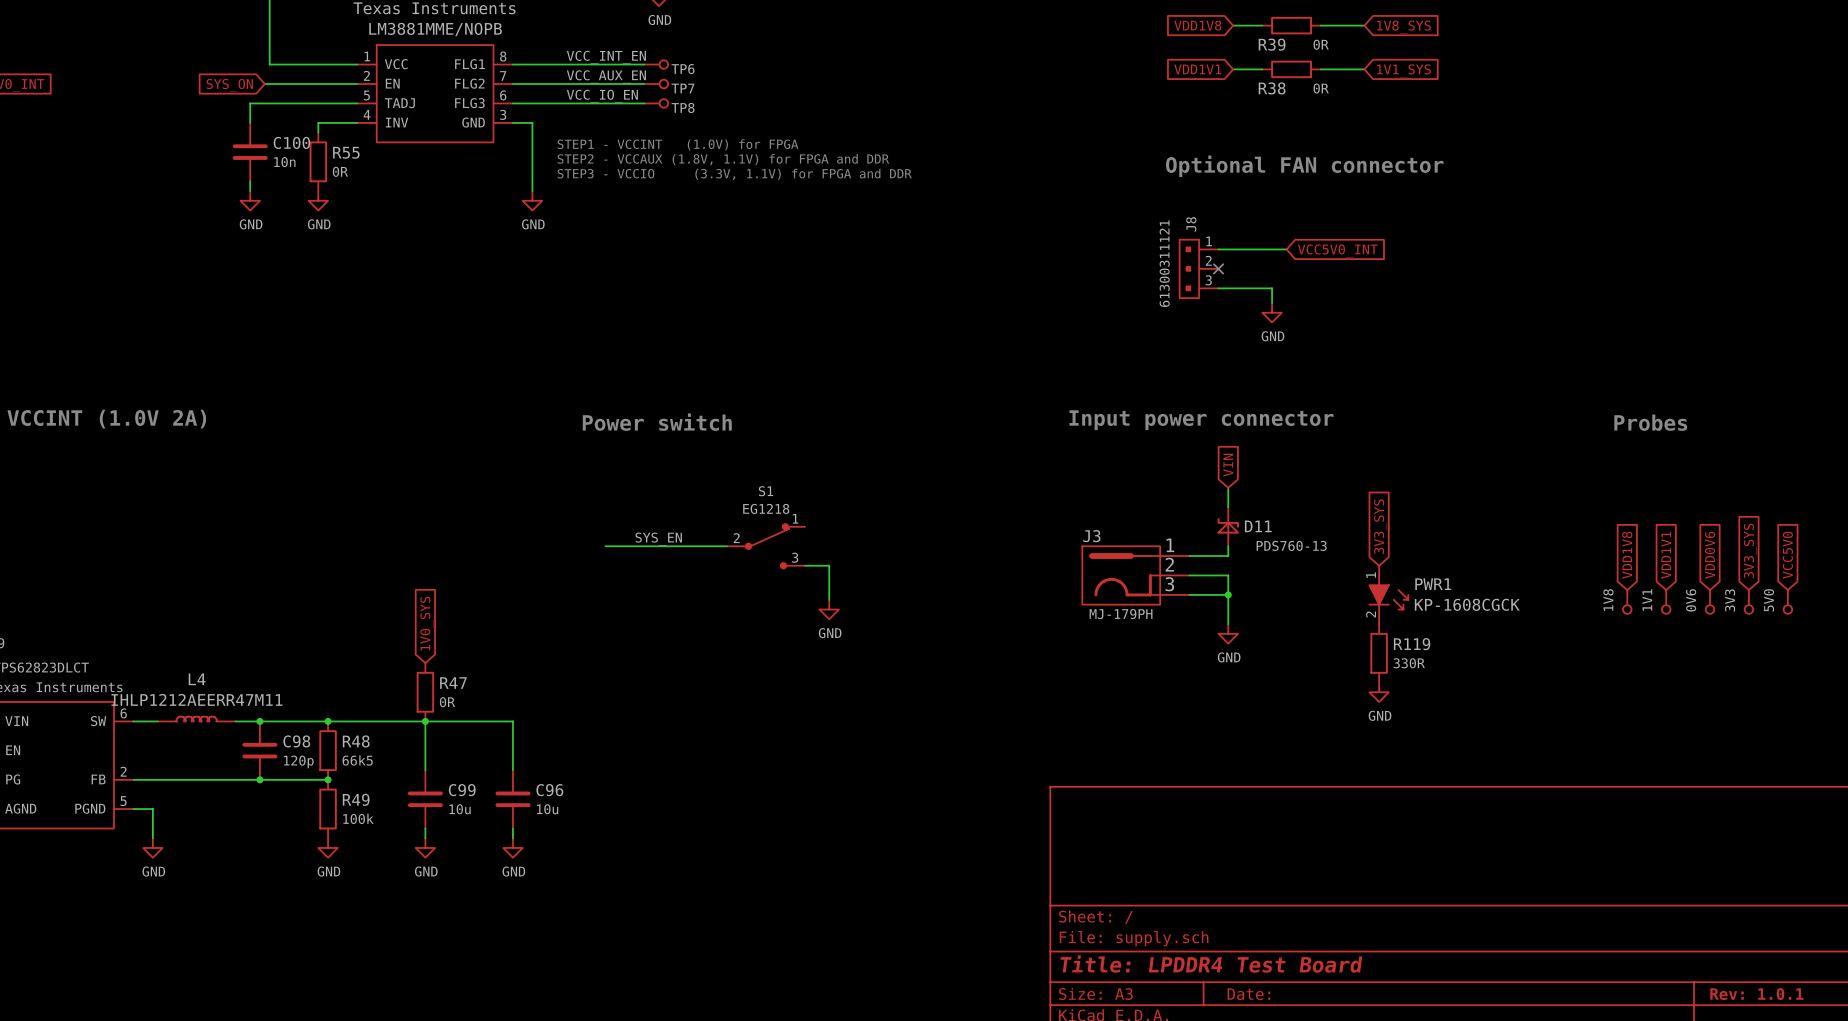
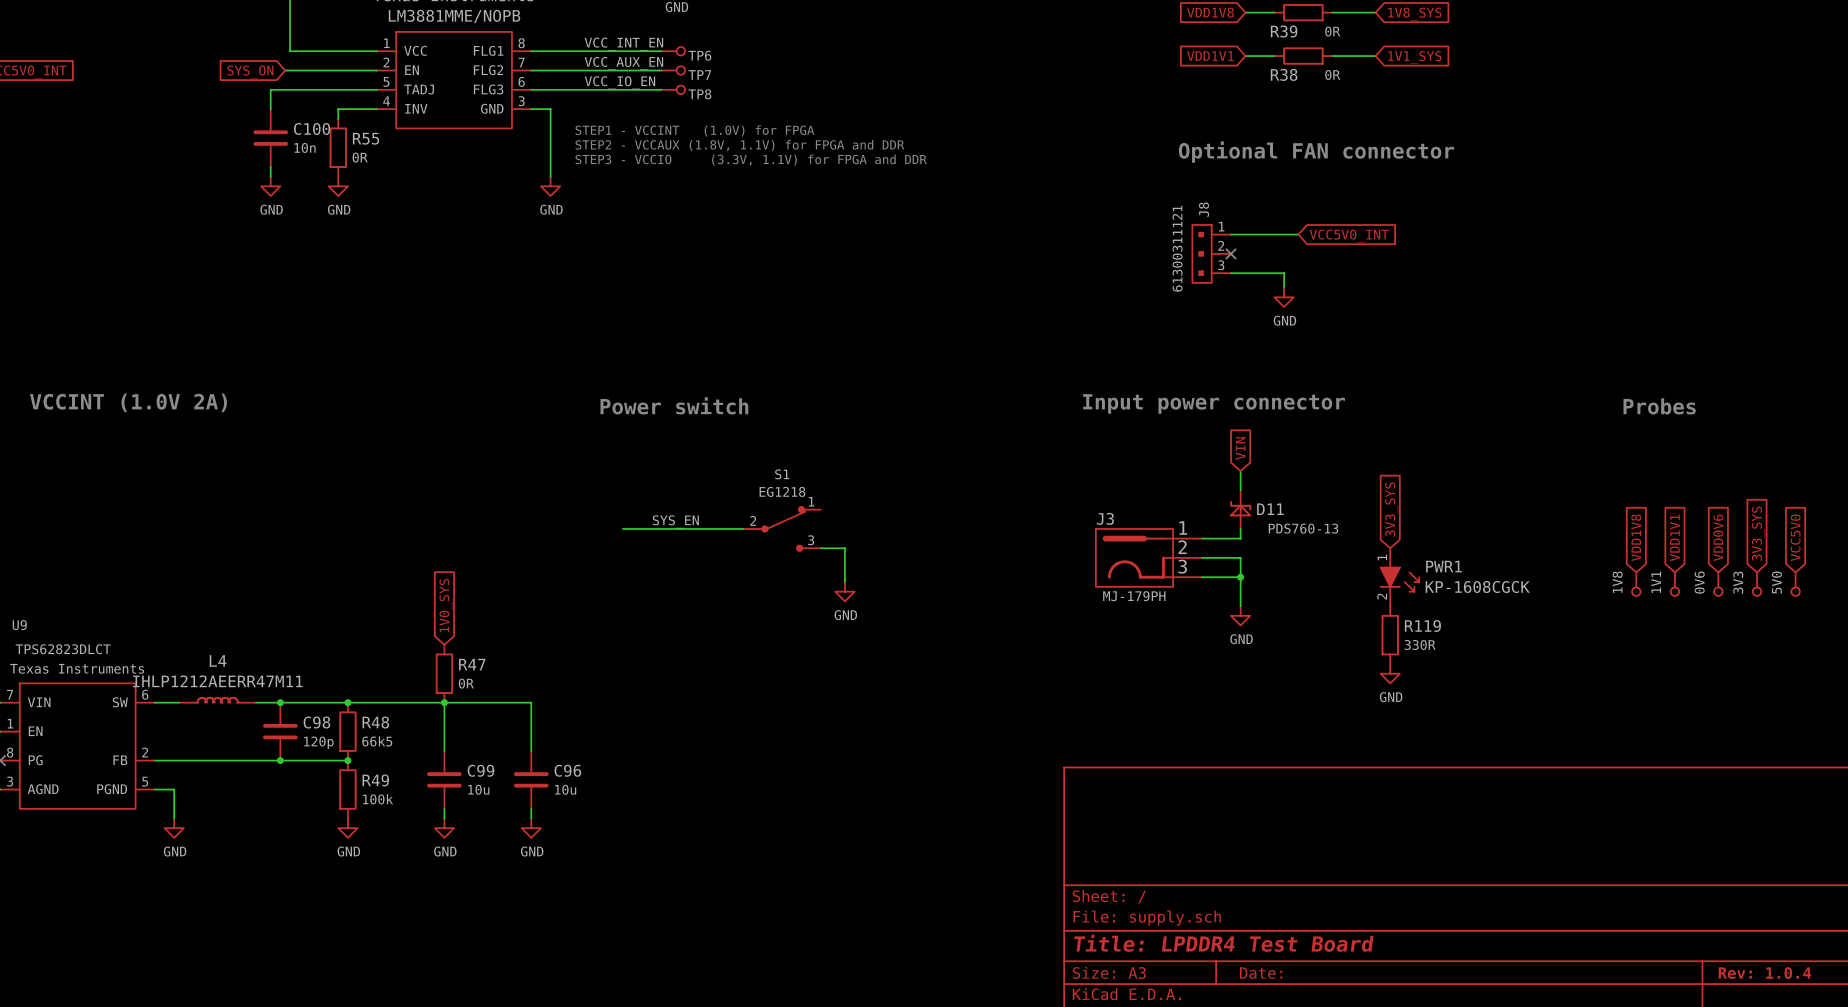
title block: Rev: 1.0.1 (1756, 994) -> Rev: 1.0.4 (1764, 973)

